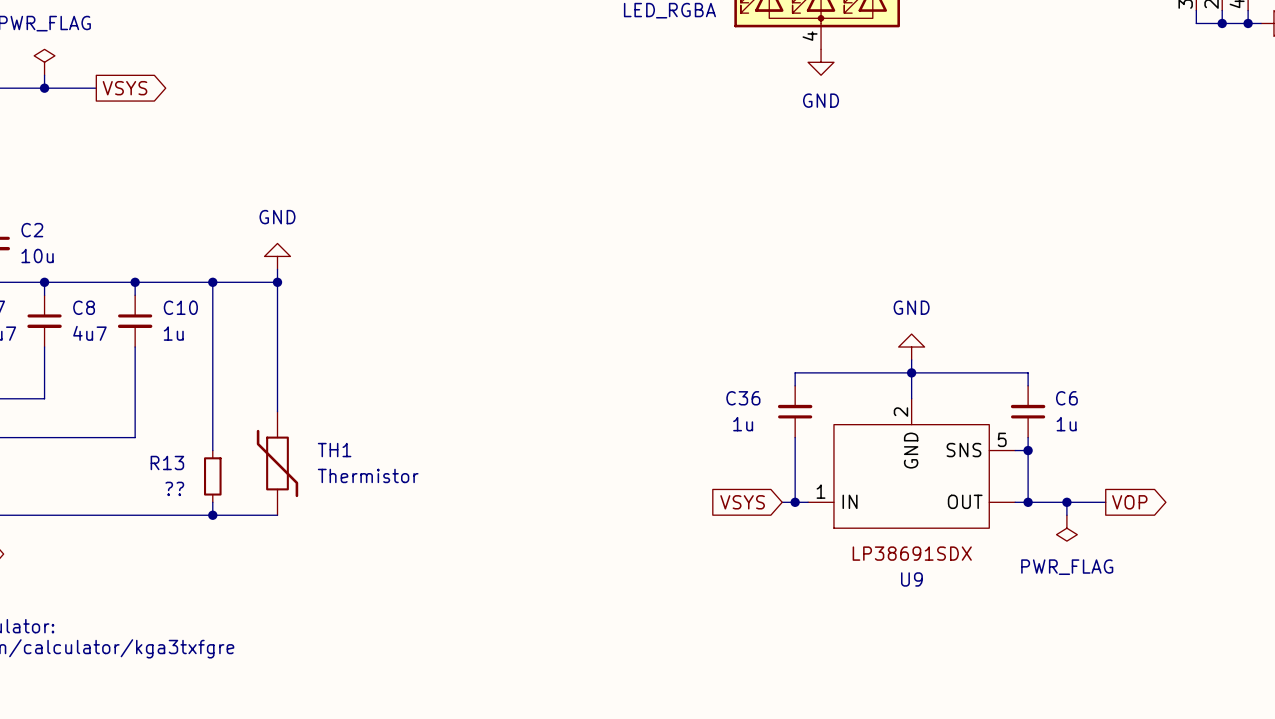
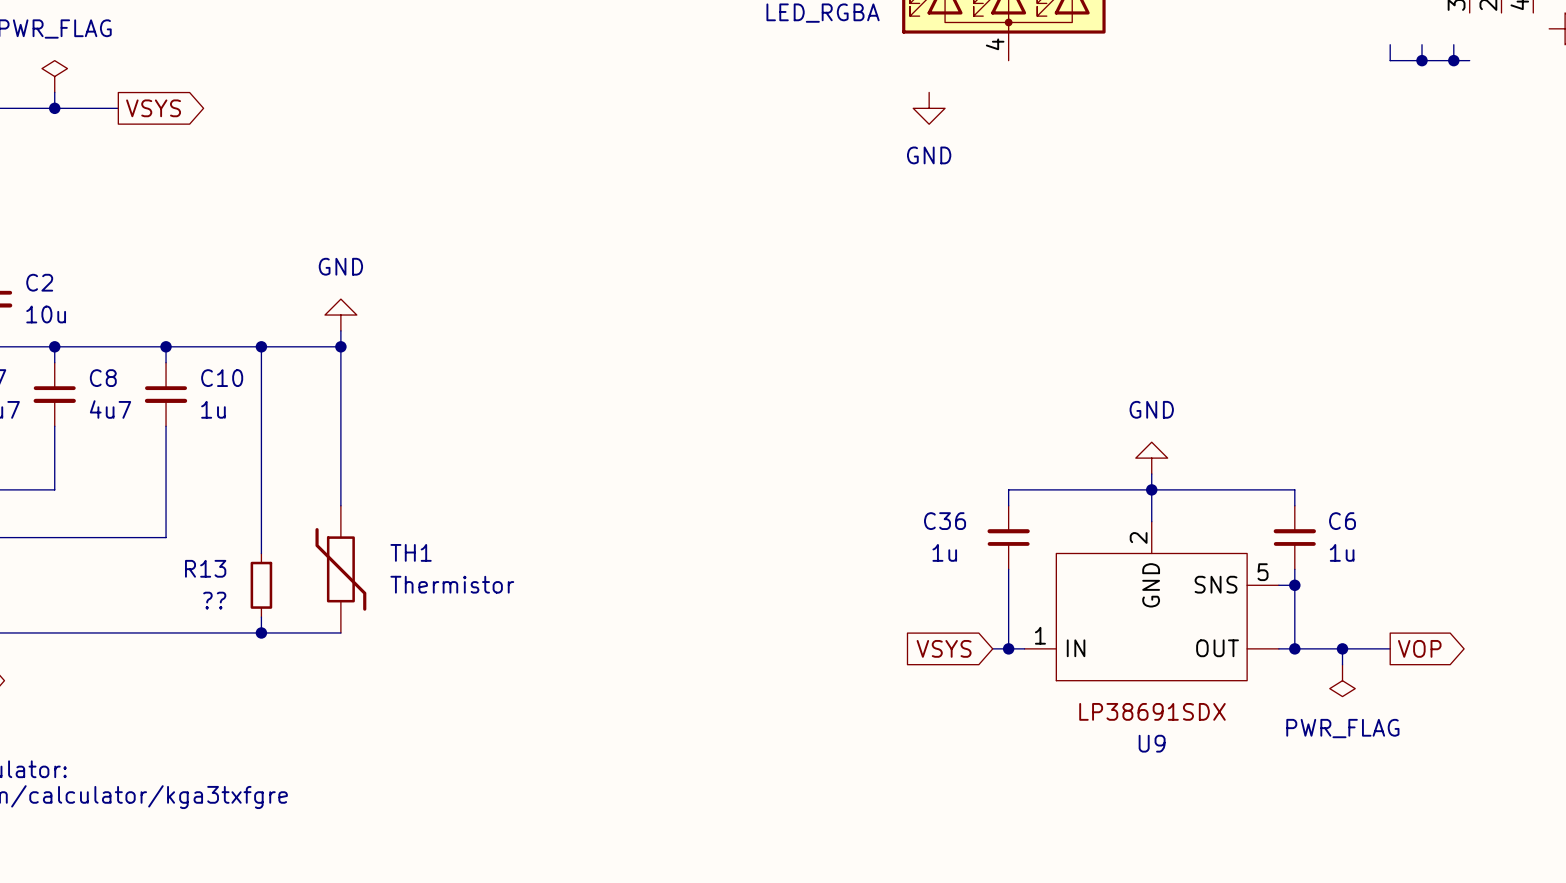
wire: (1196, 10) (1196, 23) (1261, 23) -> (1390, 44) (1390, 60) (1469, 60)
wire: (1222, 10) (1222, 23) -> (1422, 44) (1422, 60)
wire: (1248, 10) (1248, 23) -> (1453, 44) (1453, 60)
junction: (1222, 23) -> none
junction: (1248, 23) -> none
junction: none -> (1422, 60)
junction: none -> (1453, 60)
power symbol position: GND (821, 62) -> GND (929, 108)
power symbol position: GND (911, 347) -> GND (1151, 458)
wire: (911, 359) (911, 398) -> (1151, 474) (1151, 521)
junction position: (911, 372) -> (1151, 489)
wire: (795, 385) (795, 372) (1028, 372) (1028, 385) -> (1008, 505) (1008, 489) (1294, 489) (1294, 505)
C36 position: (795, 411) -> (1008, 537)
C6 position: (1028, 411) -> (1294, 537)
wire: (795, 437) (795, 502) -> (1008, 569) (1008, 648)
wire: (1028, 437) (1028, 502) -> (1294, 569) (1294, 648)
wire: (1015, 450) (1028, 450) -> (1278, 585) (1294, 585)
junction: (1028, 450) -> none
U9 position: (911, 463) -> (1151, 601)
junction: none -> (1294, 585)
global label position: VSYS (742, 502) -> VSYS (944, 648)
wire: (782, 502) (808, 502) -> (992, 648) (1024, 648)
junction position: (795, 502) -> (1008, 648)
wire: (1015, 502) (1105, 502) -> (1278, 648) (1390, 648)
junction: (1028, 502) -> none
wire: (1066, 502) (1066, 515) -> (1342, 648) (1342, 664)
junction: (1066, 502) -> none
global label position: VOP (1129, 502) -> VOP (1419, 648)
junction: none -> (1294, 648)
power symbol position: PWR_FLAG (1066, 528) -> PWR_FLAG (1342, 680)
junction: none -> (1342, 648)

